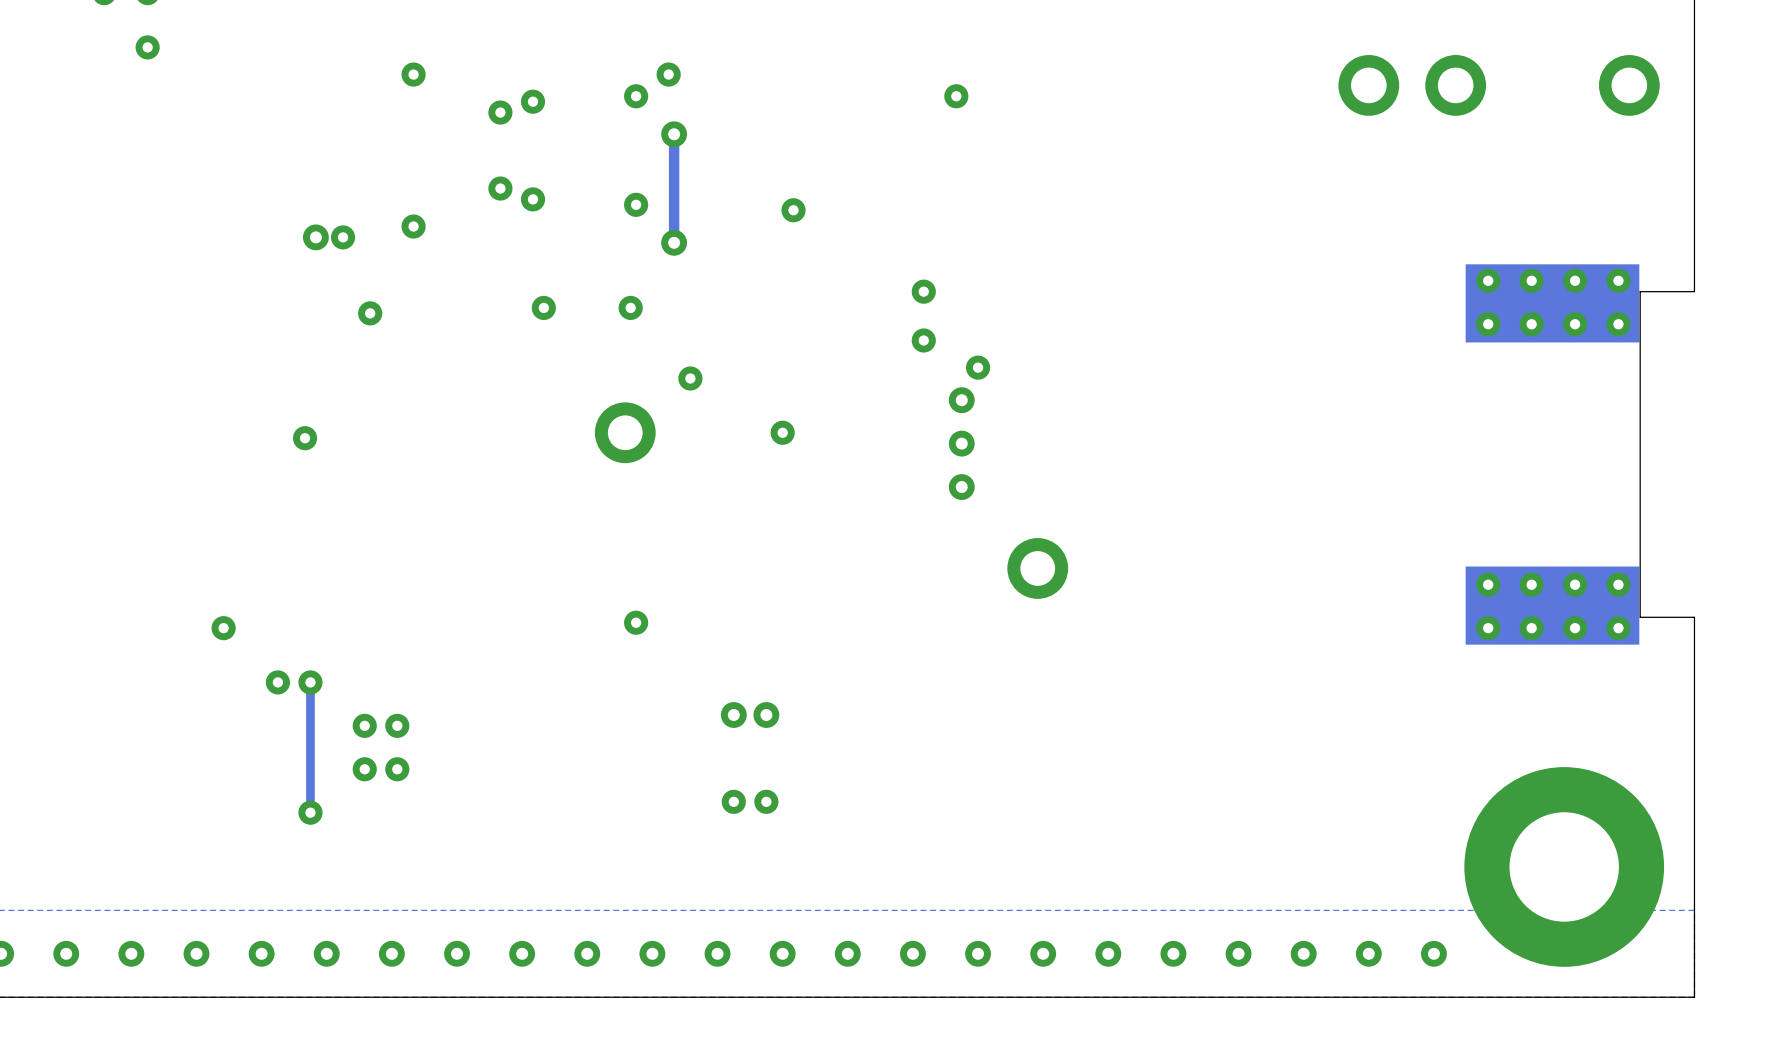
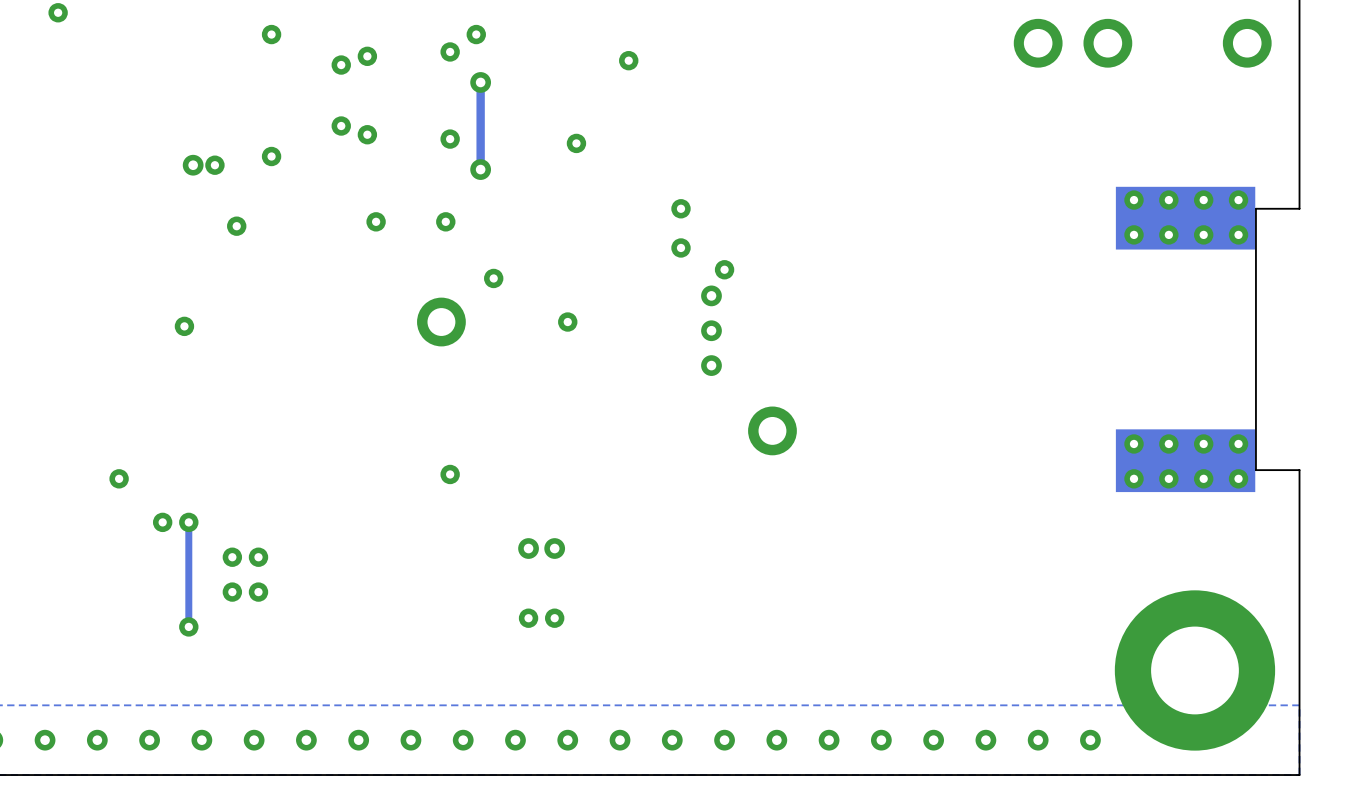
via position: (956, 96) -> (628, 60)

